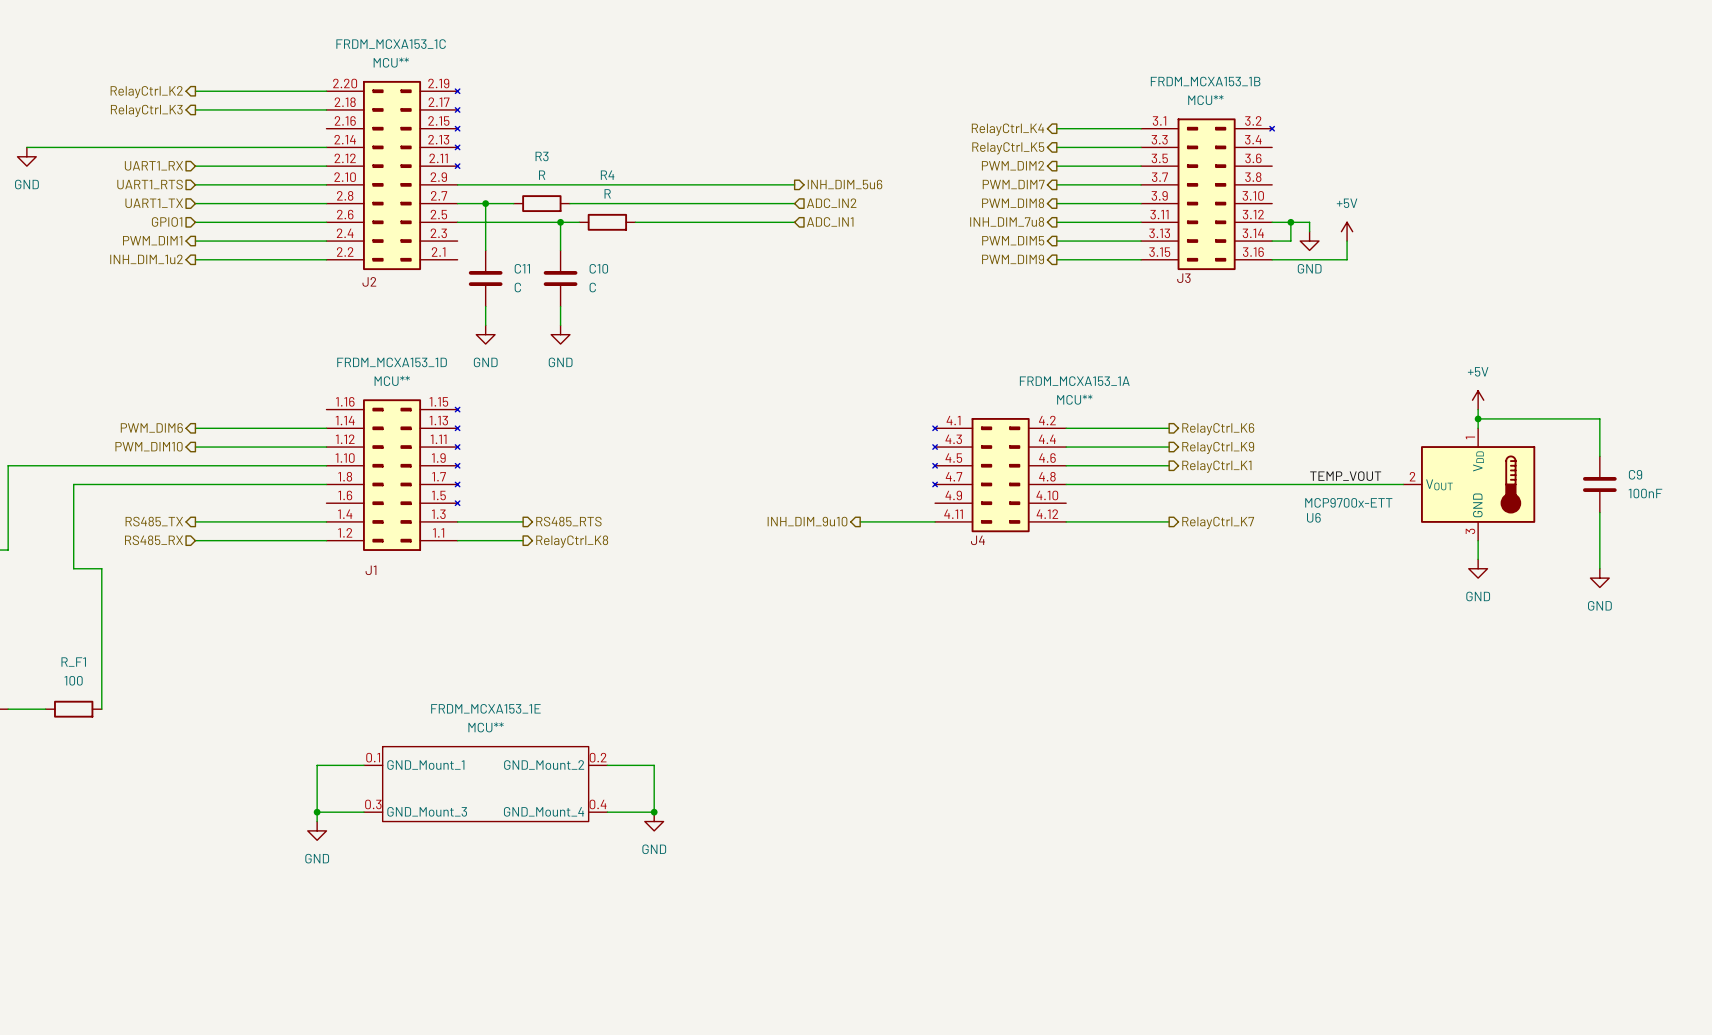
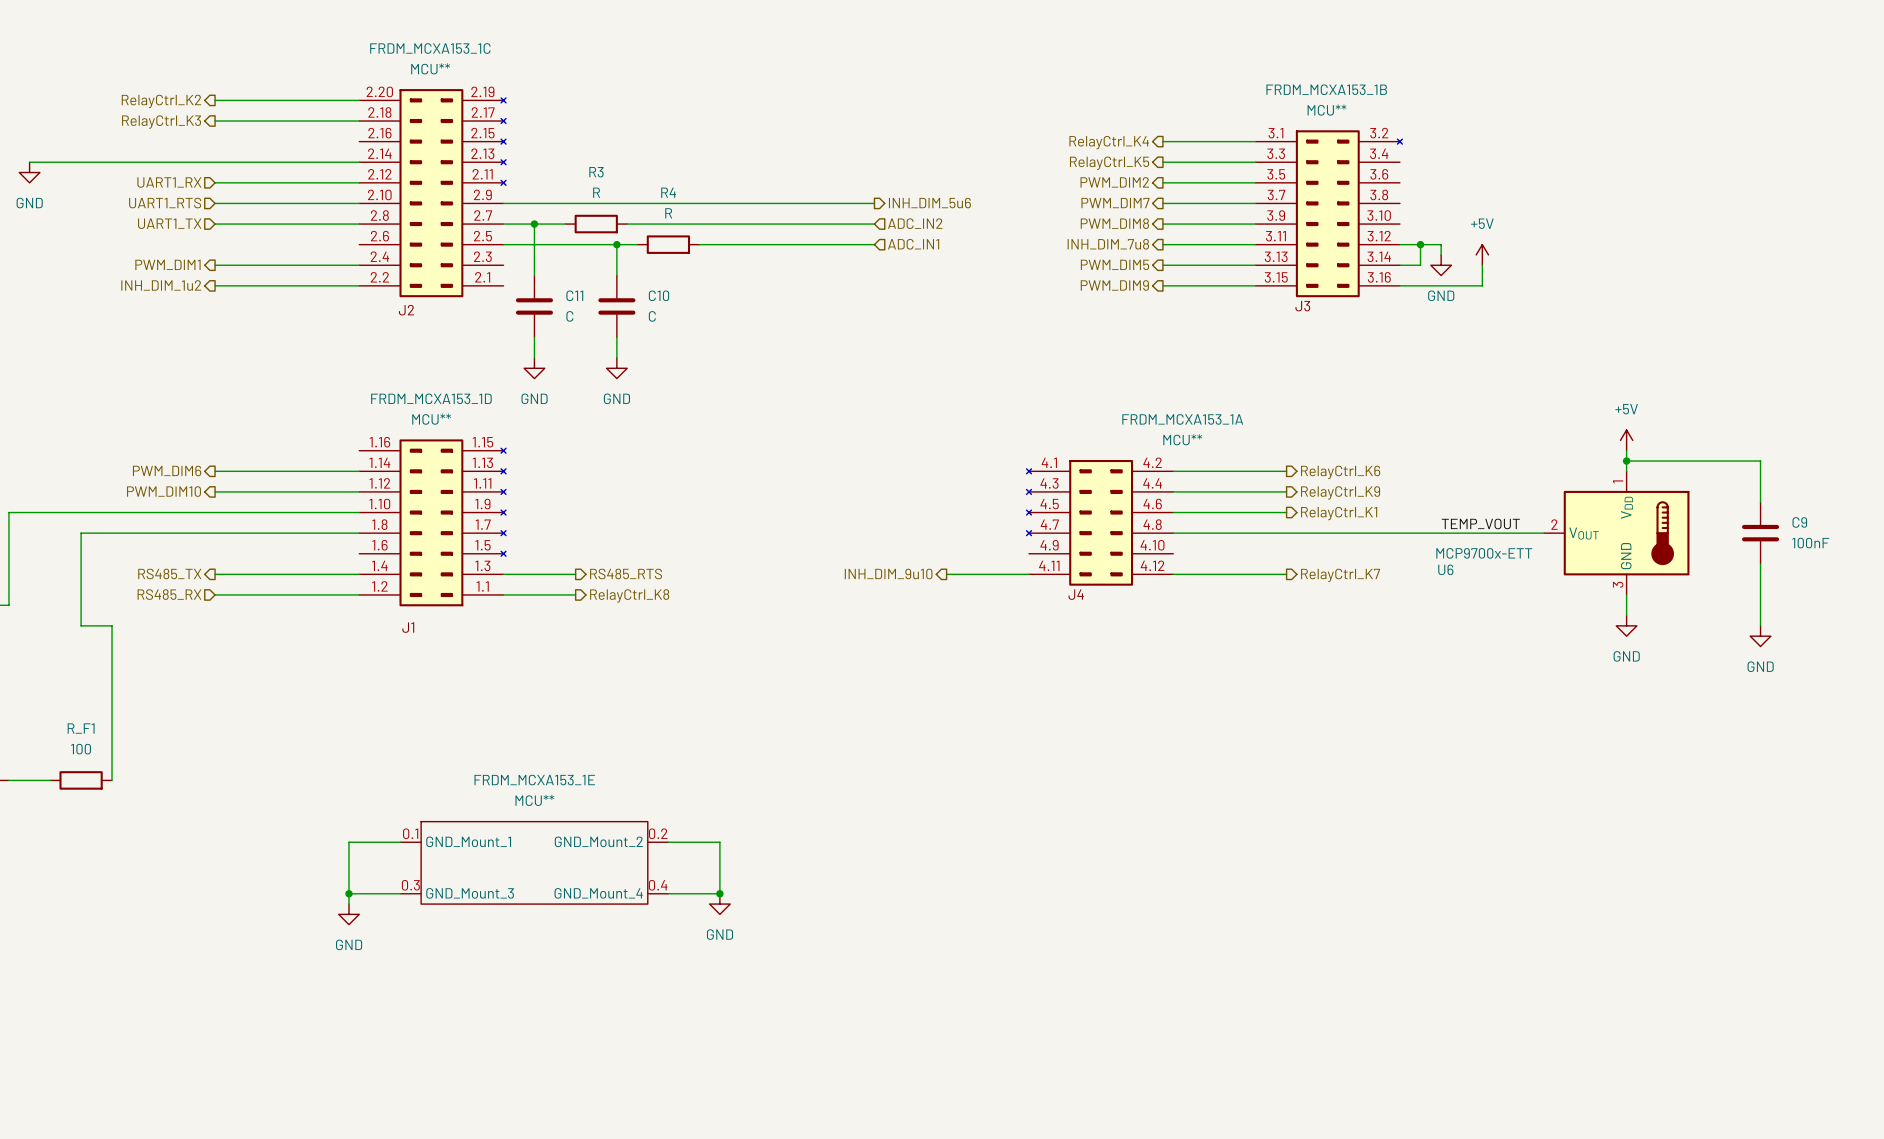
hierarchical label: GPIO1 (167, 221) -> none
wire: (195, 222) (326, 222) -> none

